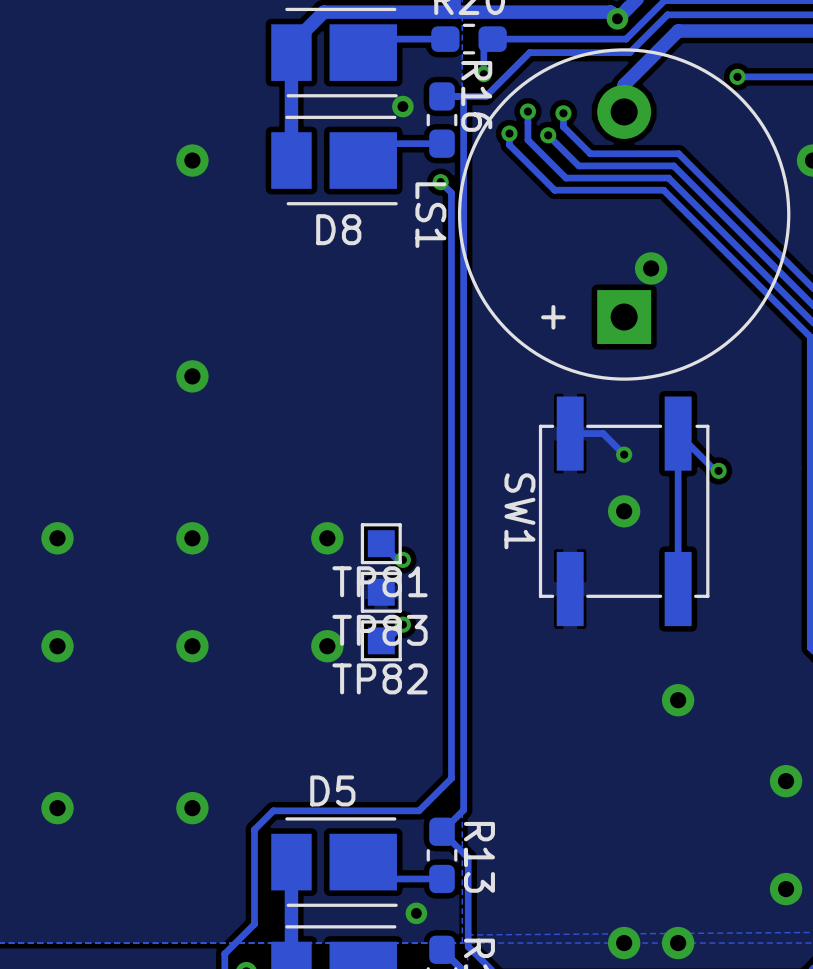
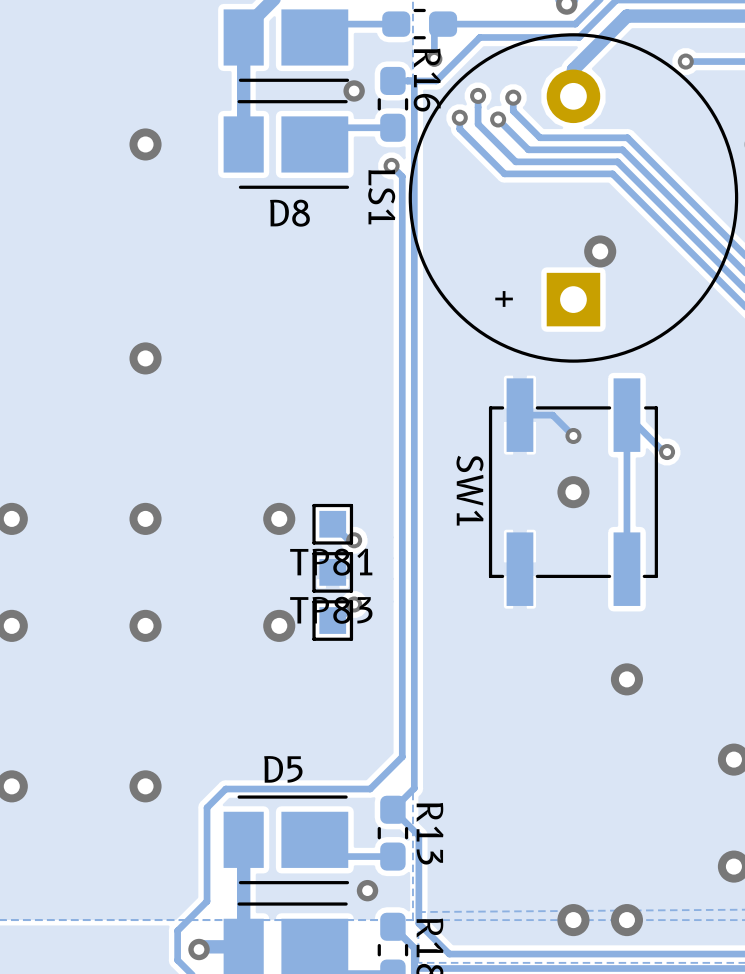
TP82 name: TP82 (380, 678) -> none

